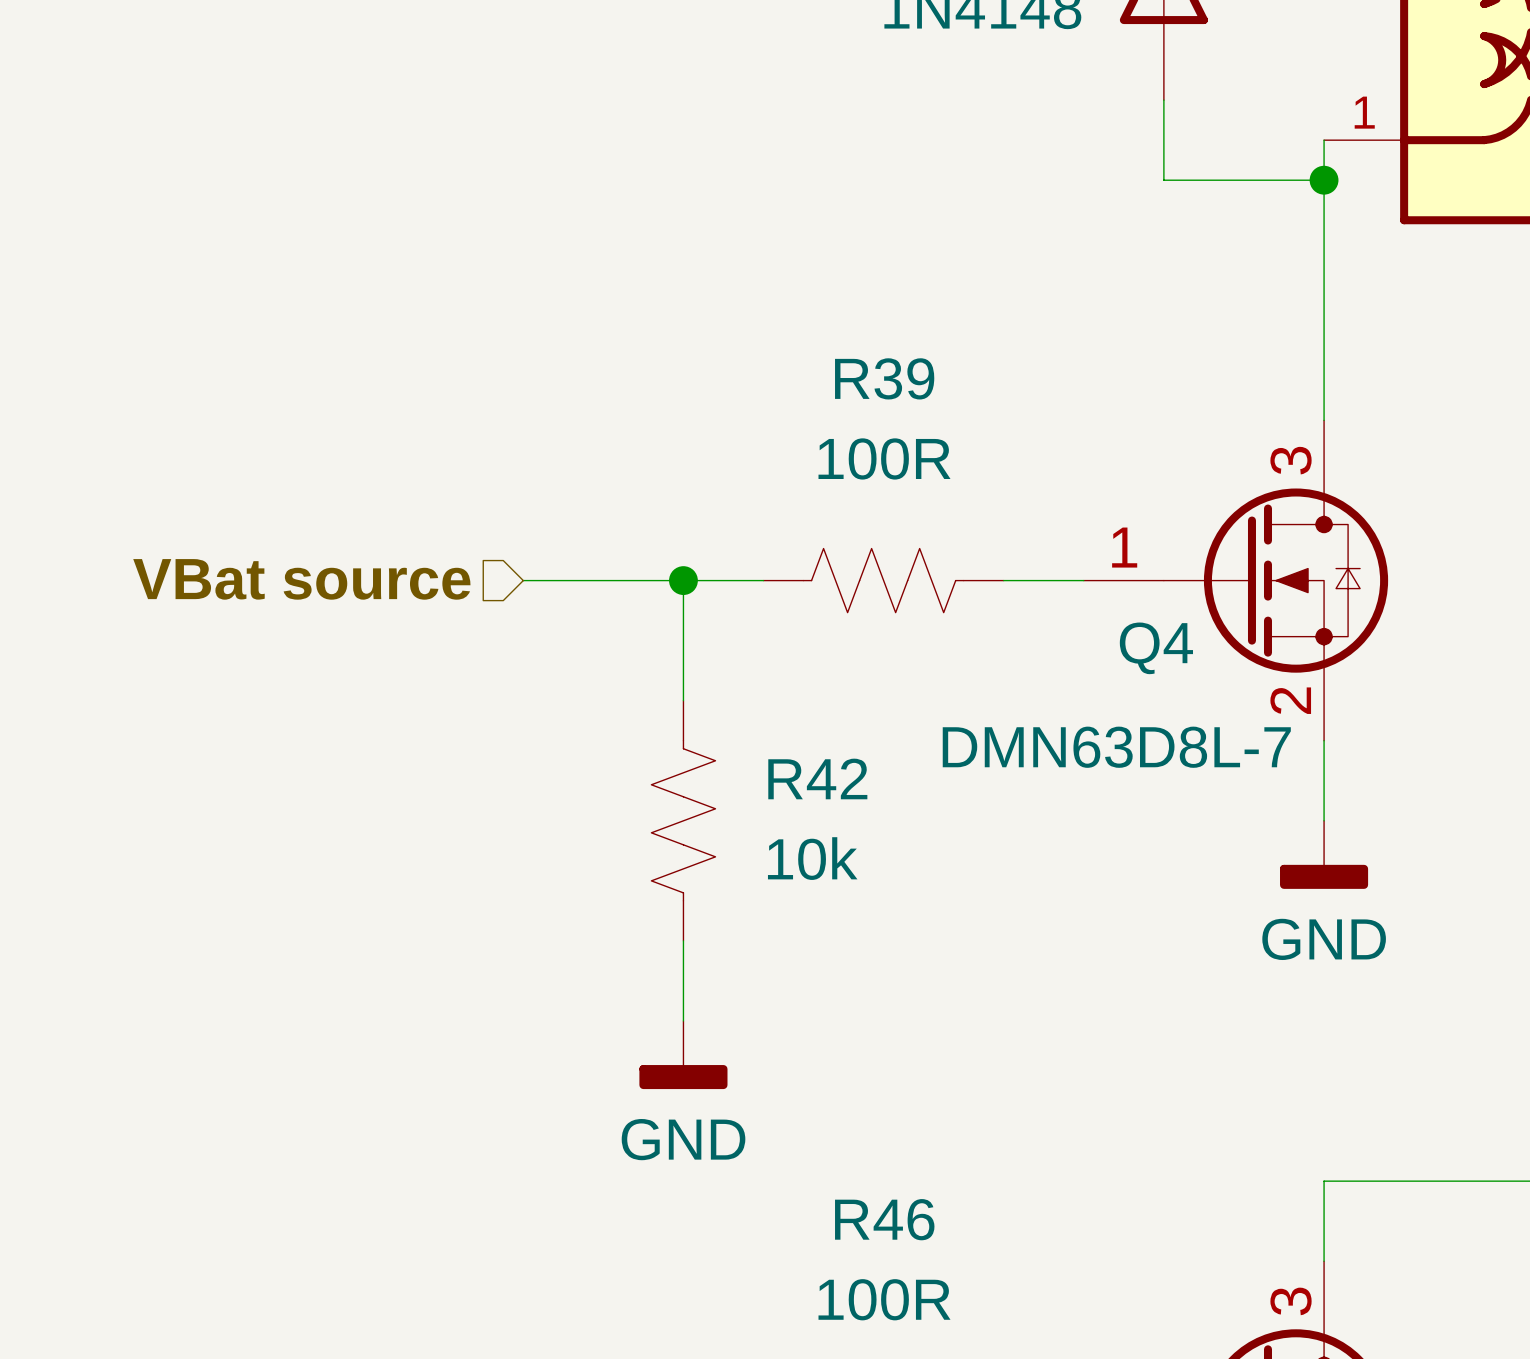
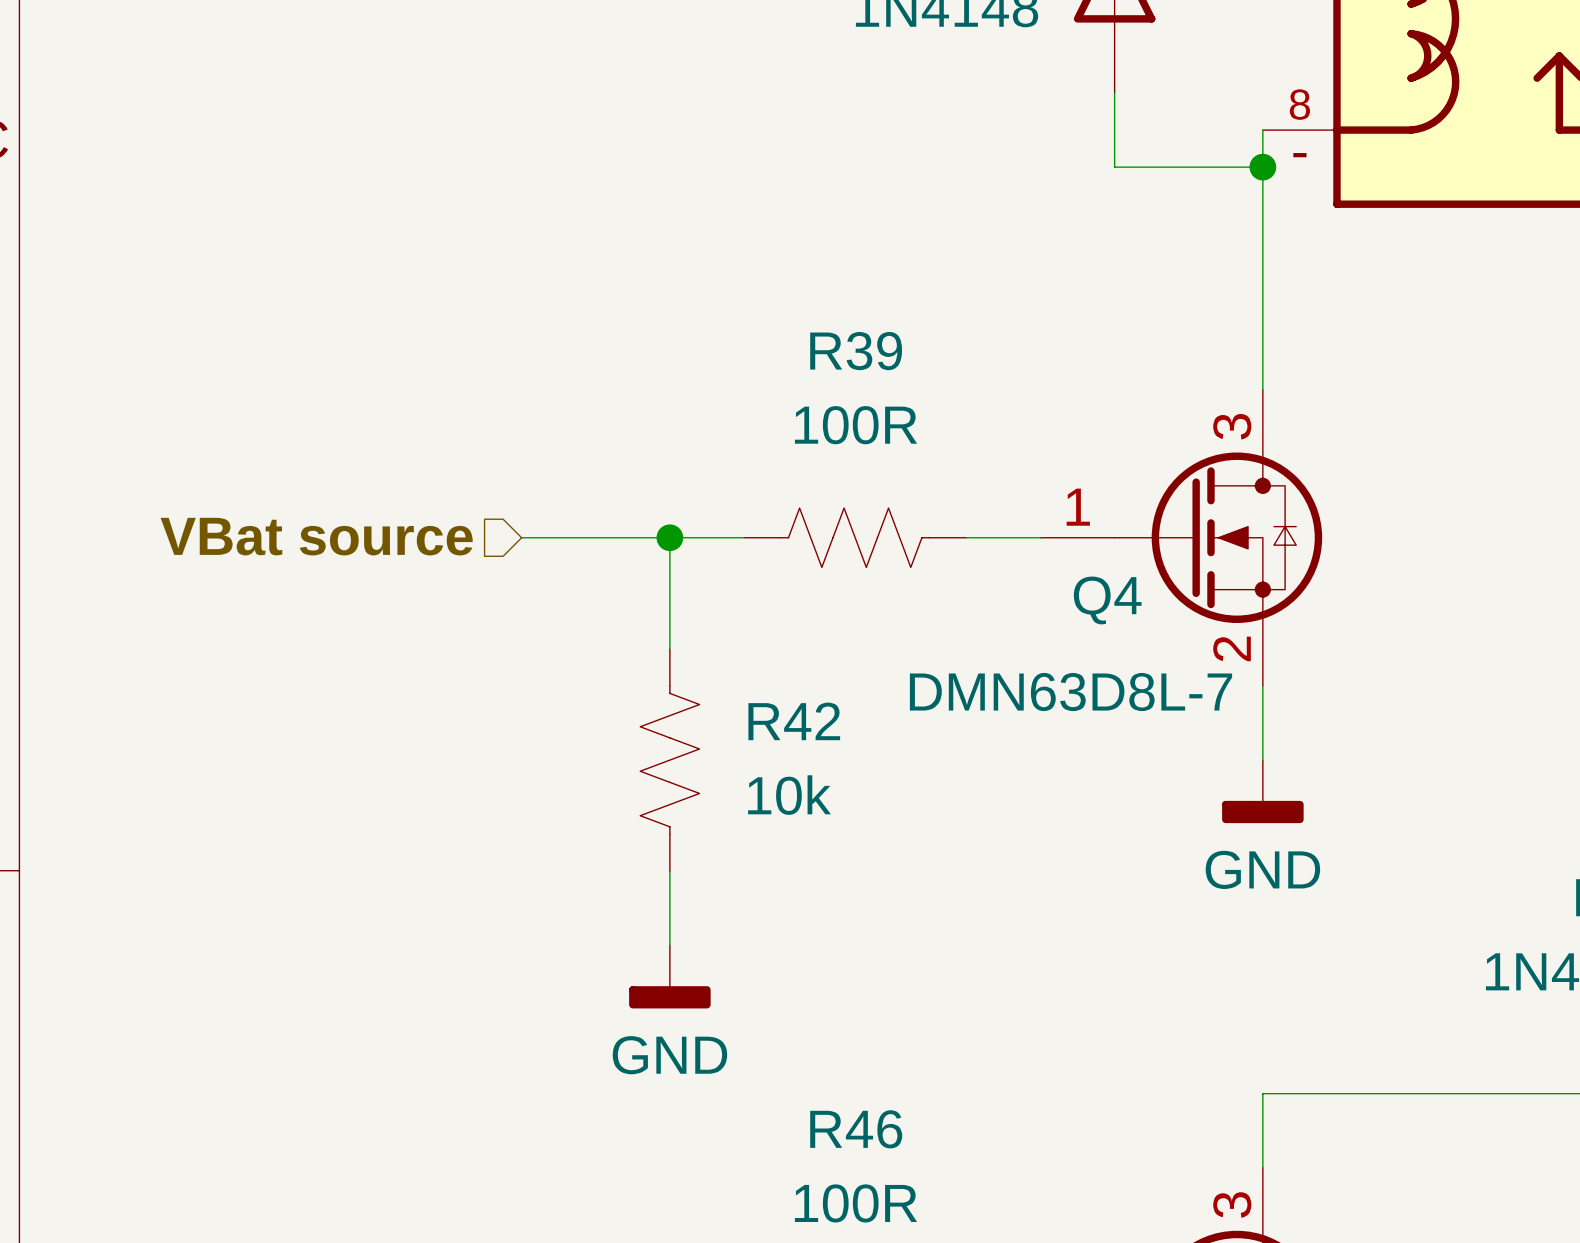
part pin number: 1 (1364, 112) -> 8 (1299, 104)
part text: none -> - (1299, 155)

